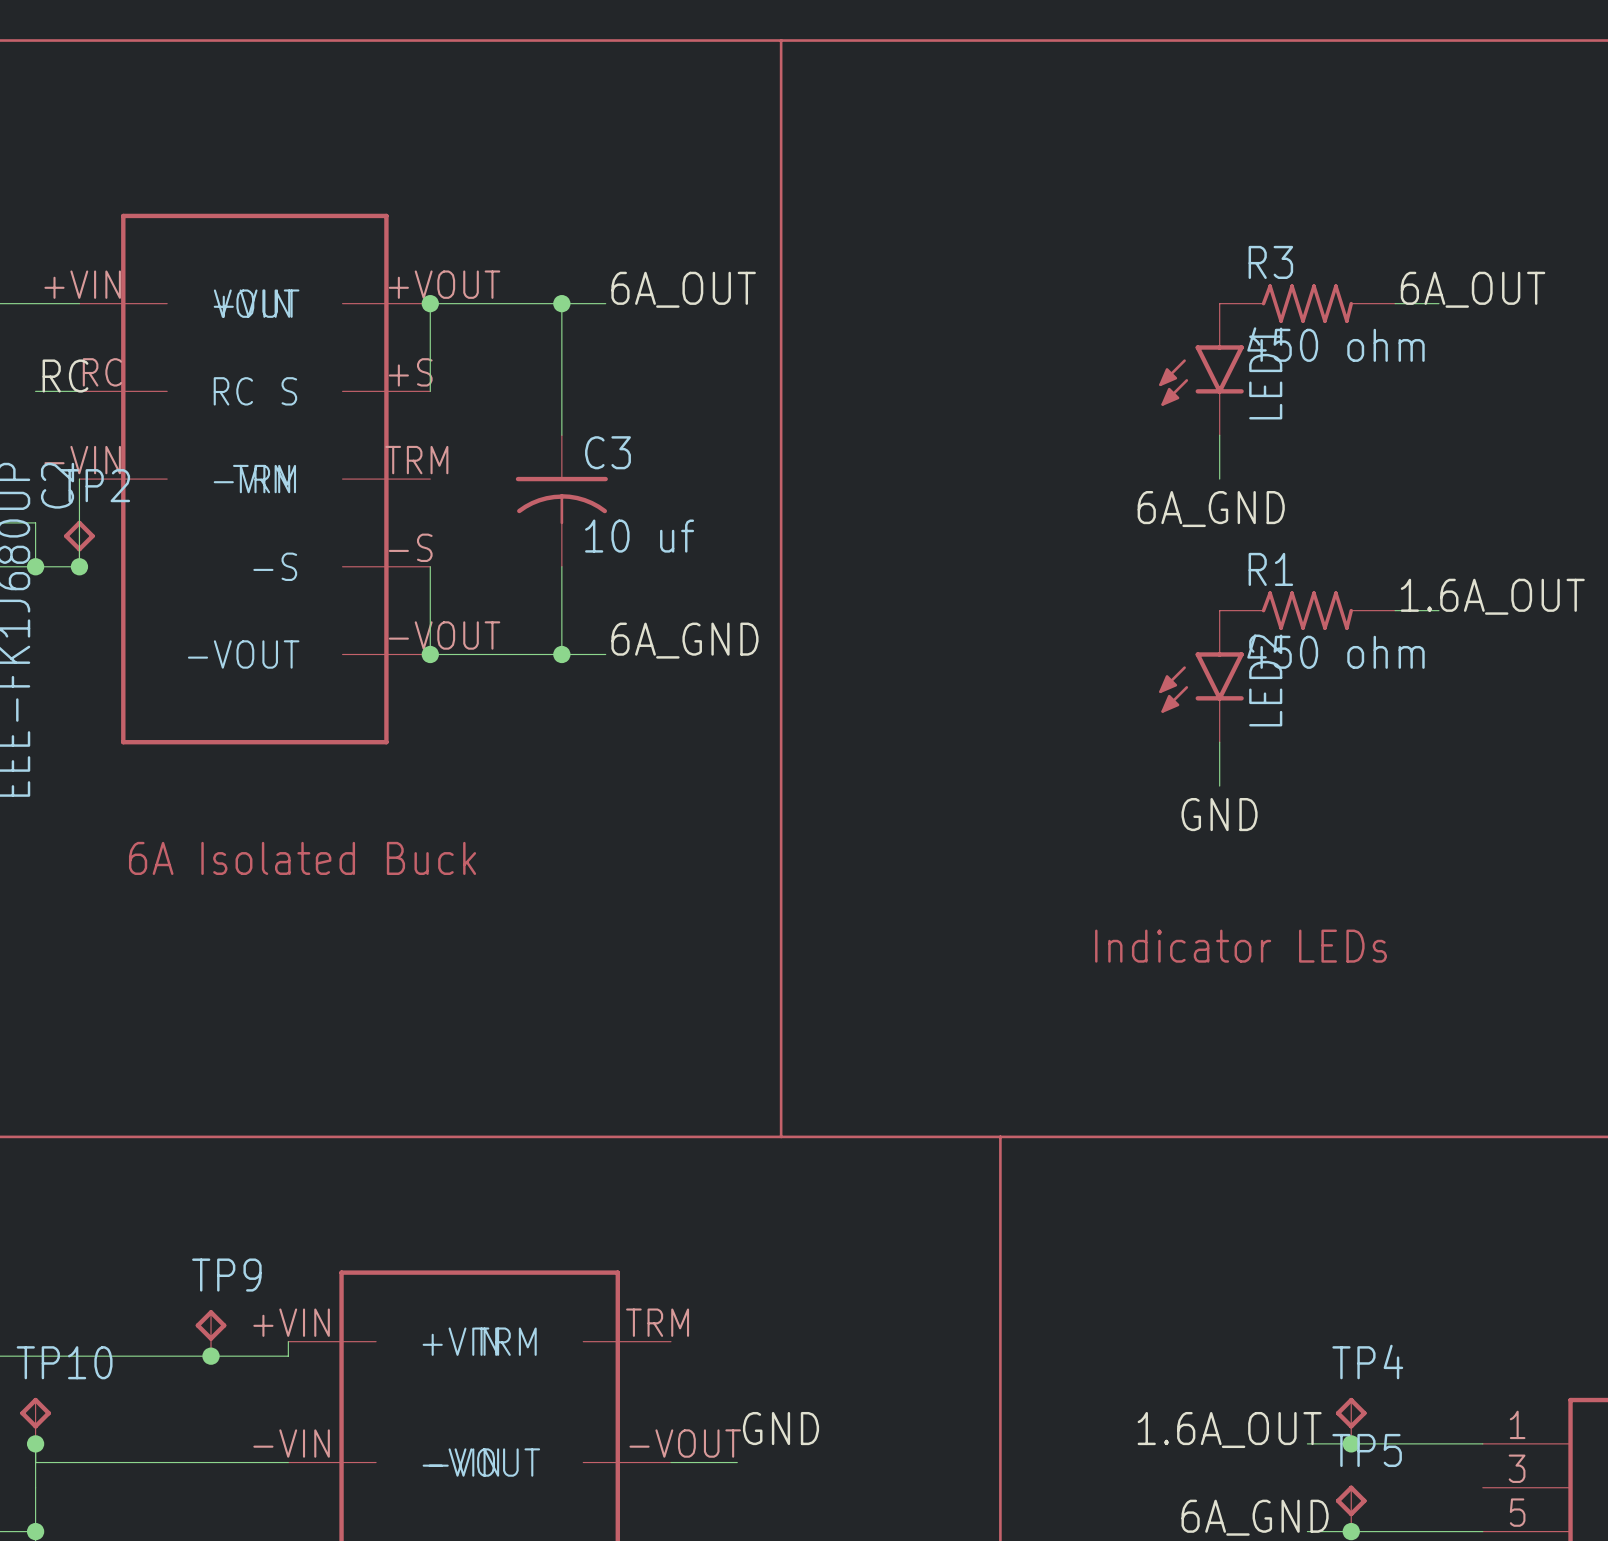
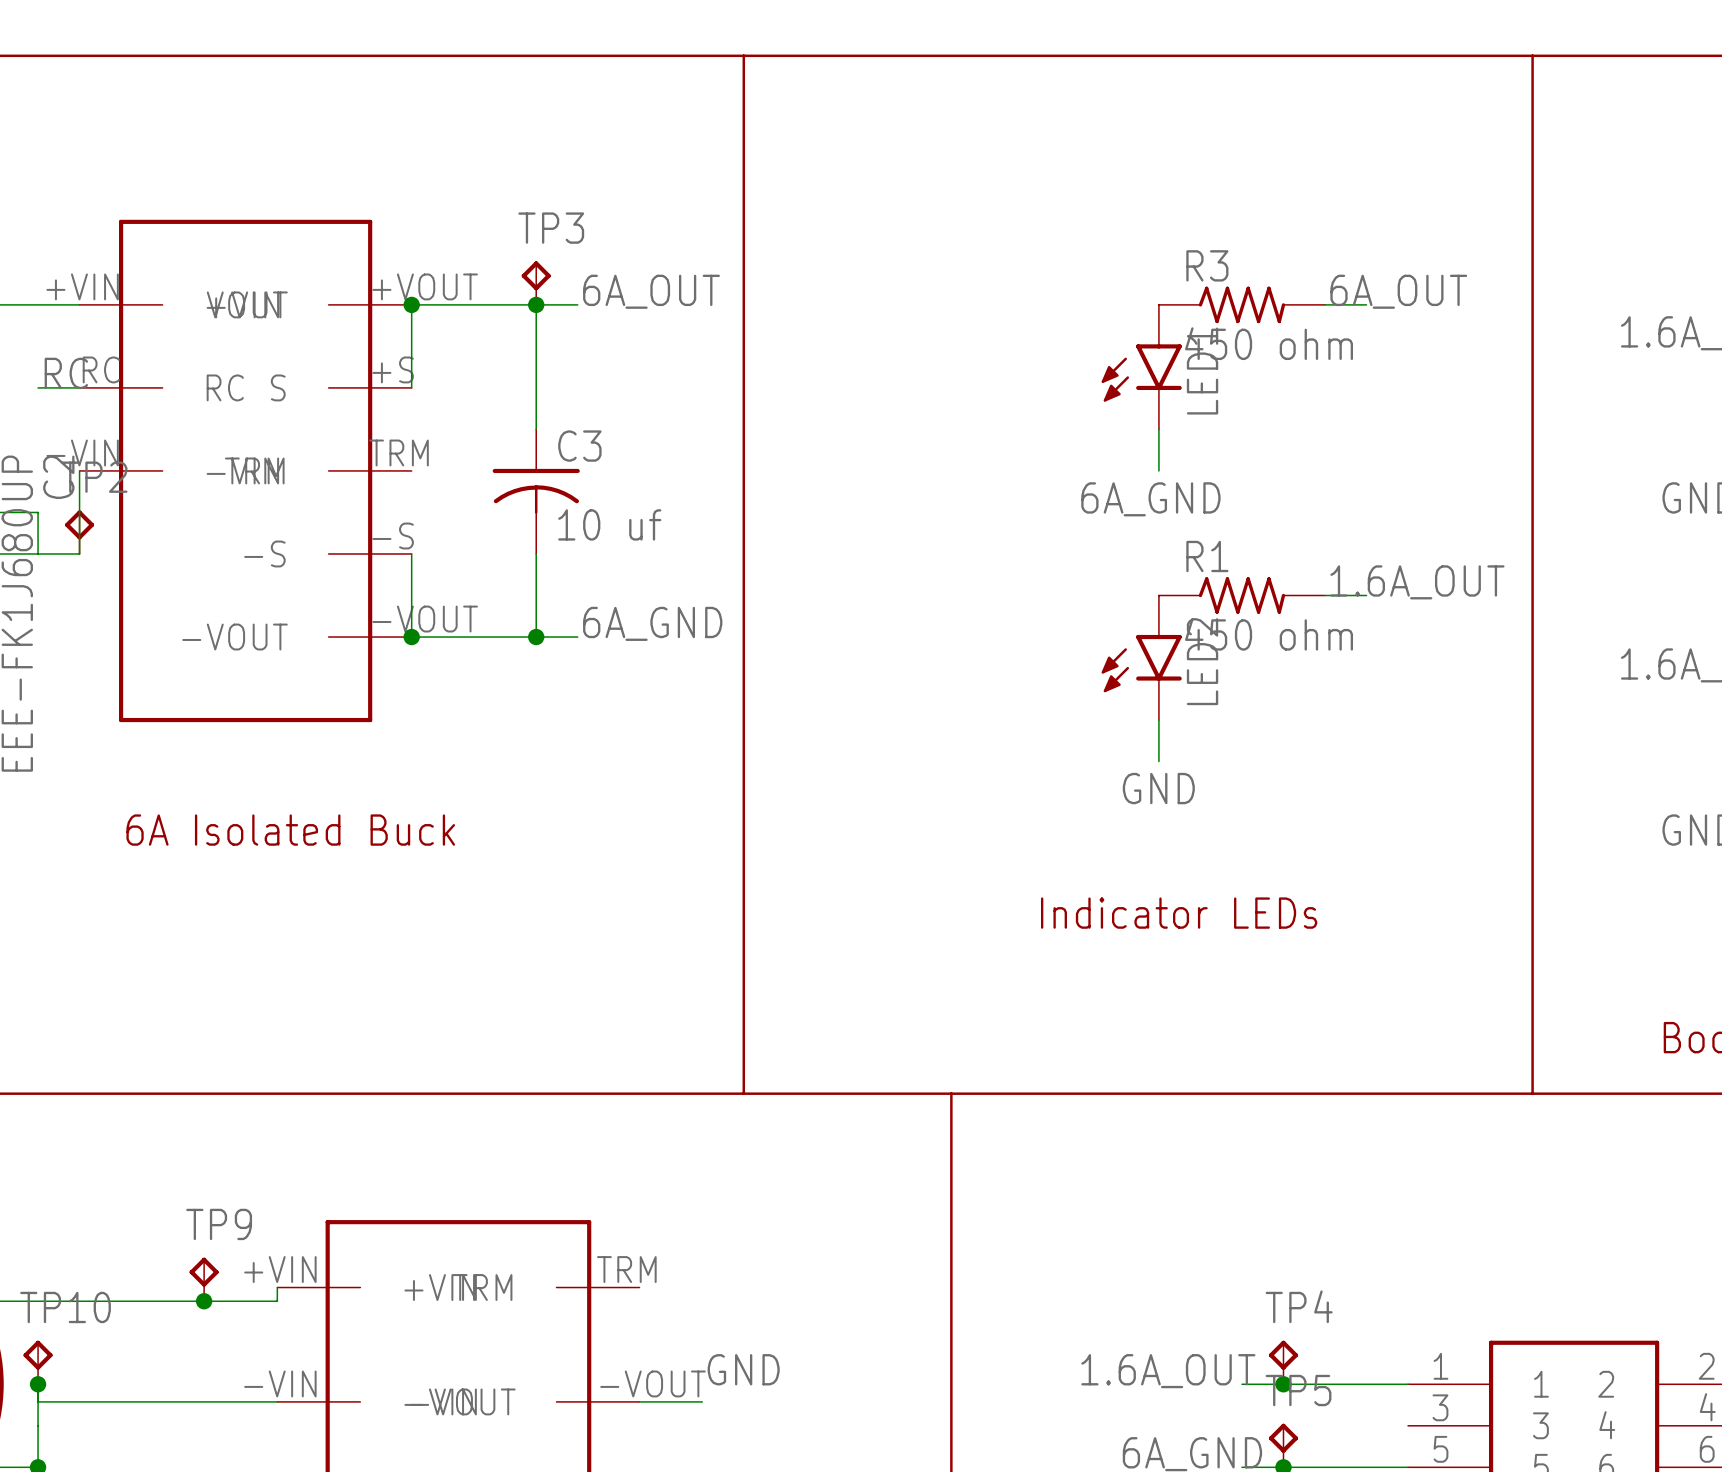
TP3: none -> (536, 283)
junction: (35, 566) -> none
junction: (79, 566) -> none

